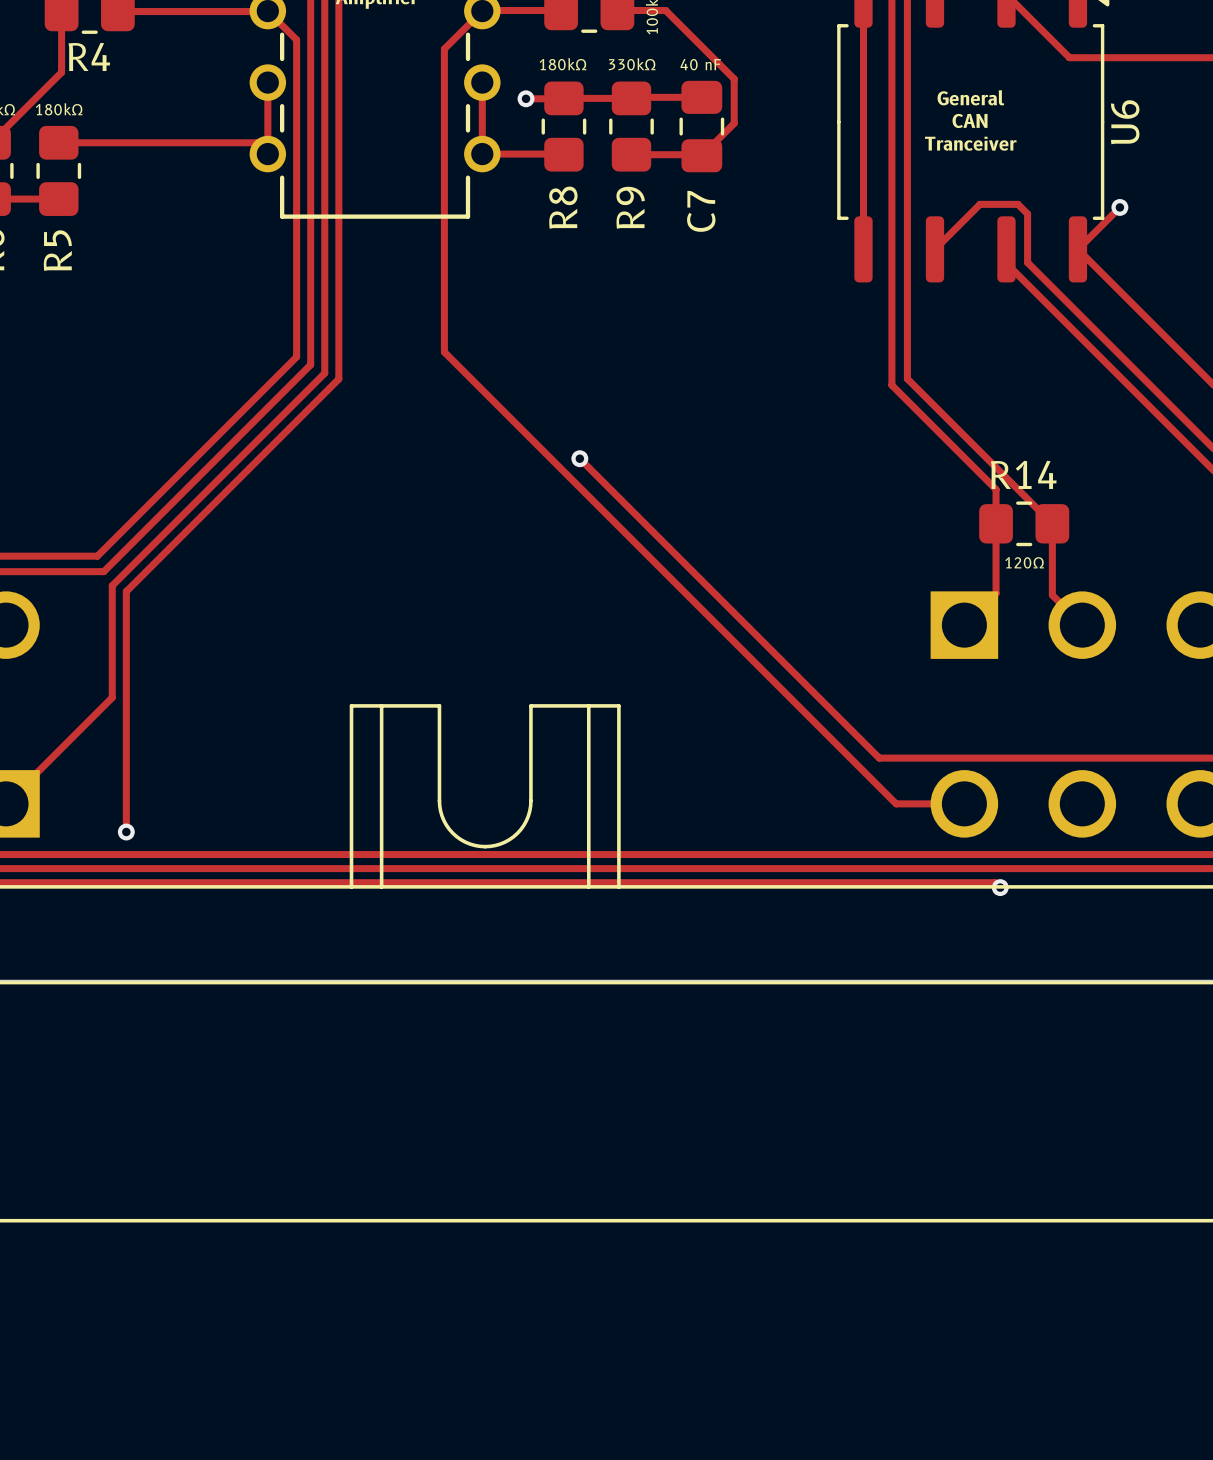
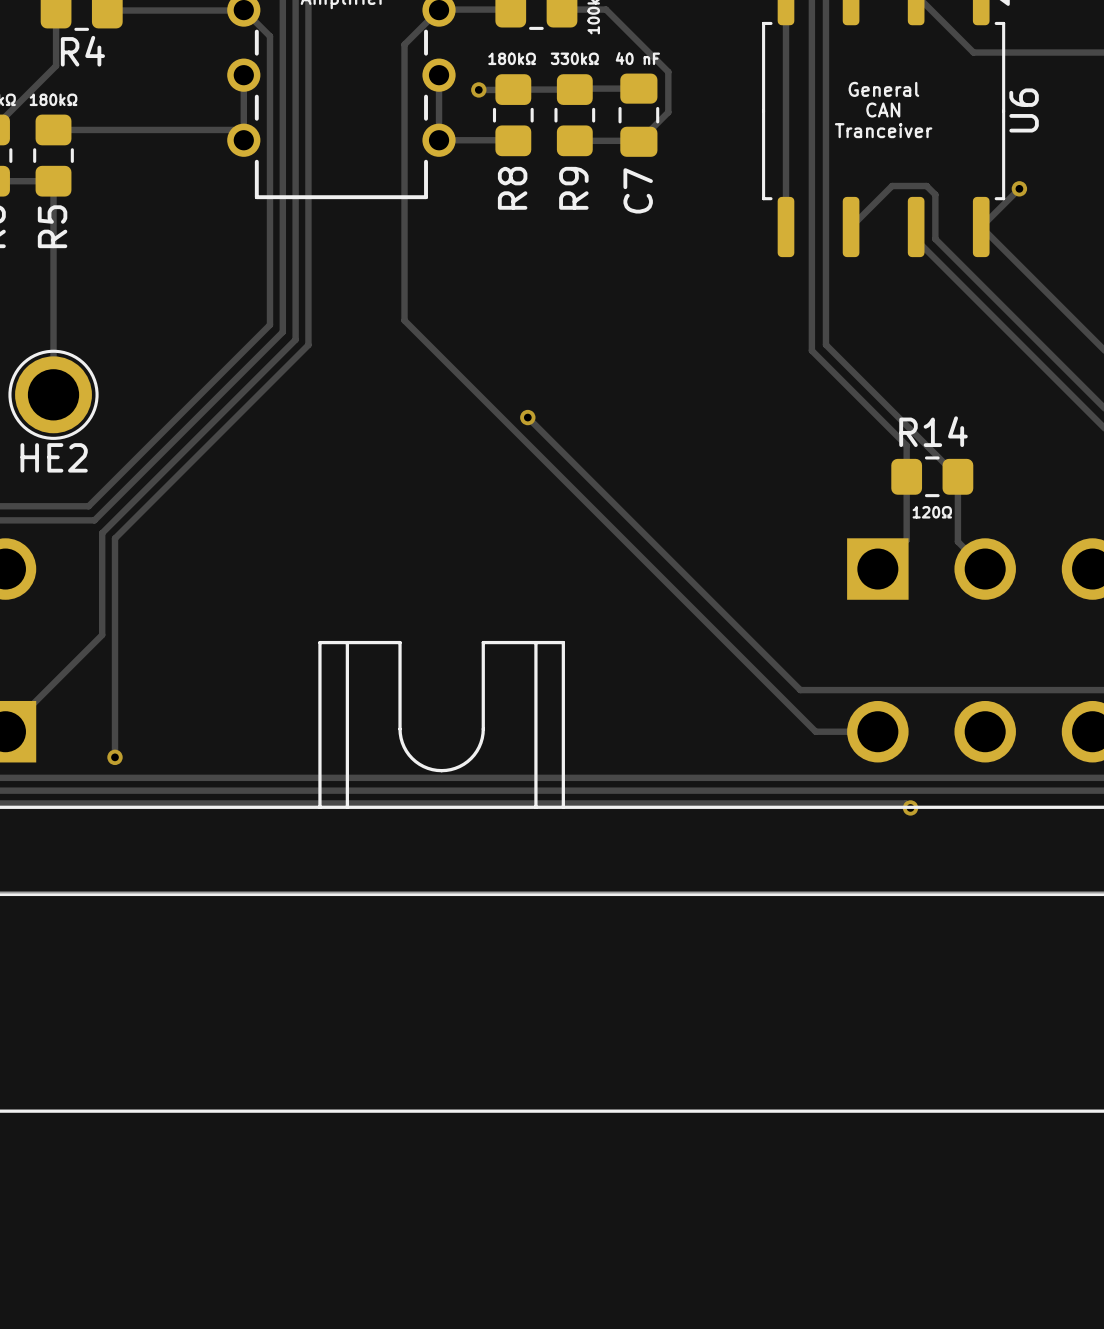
track: none -> (53, 181) (53, 394)
HE2: none -> (53, 394)

